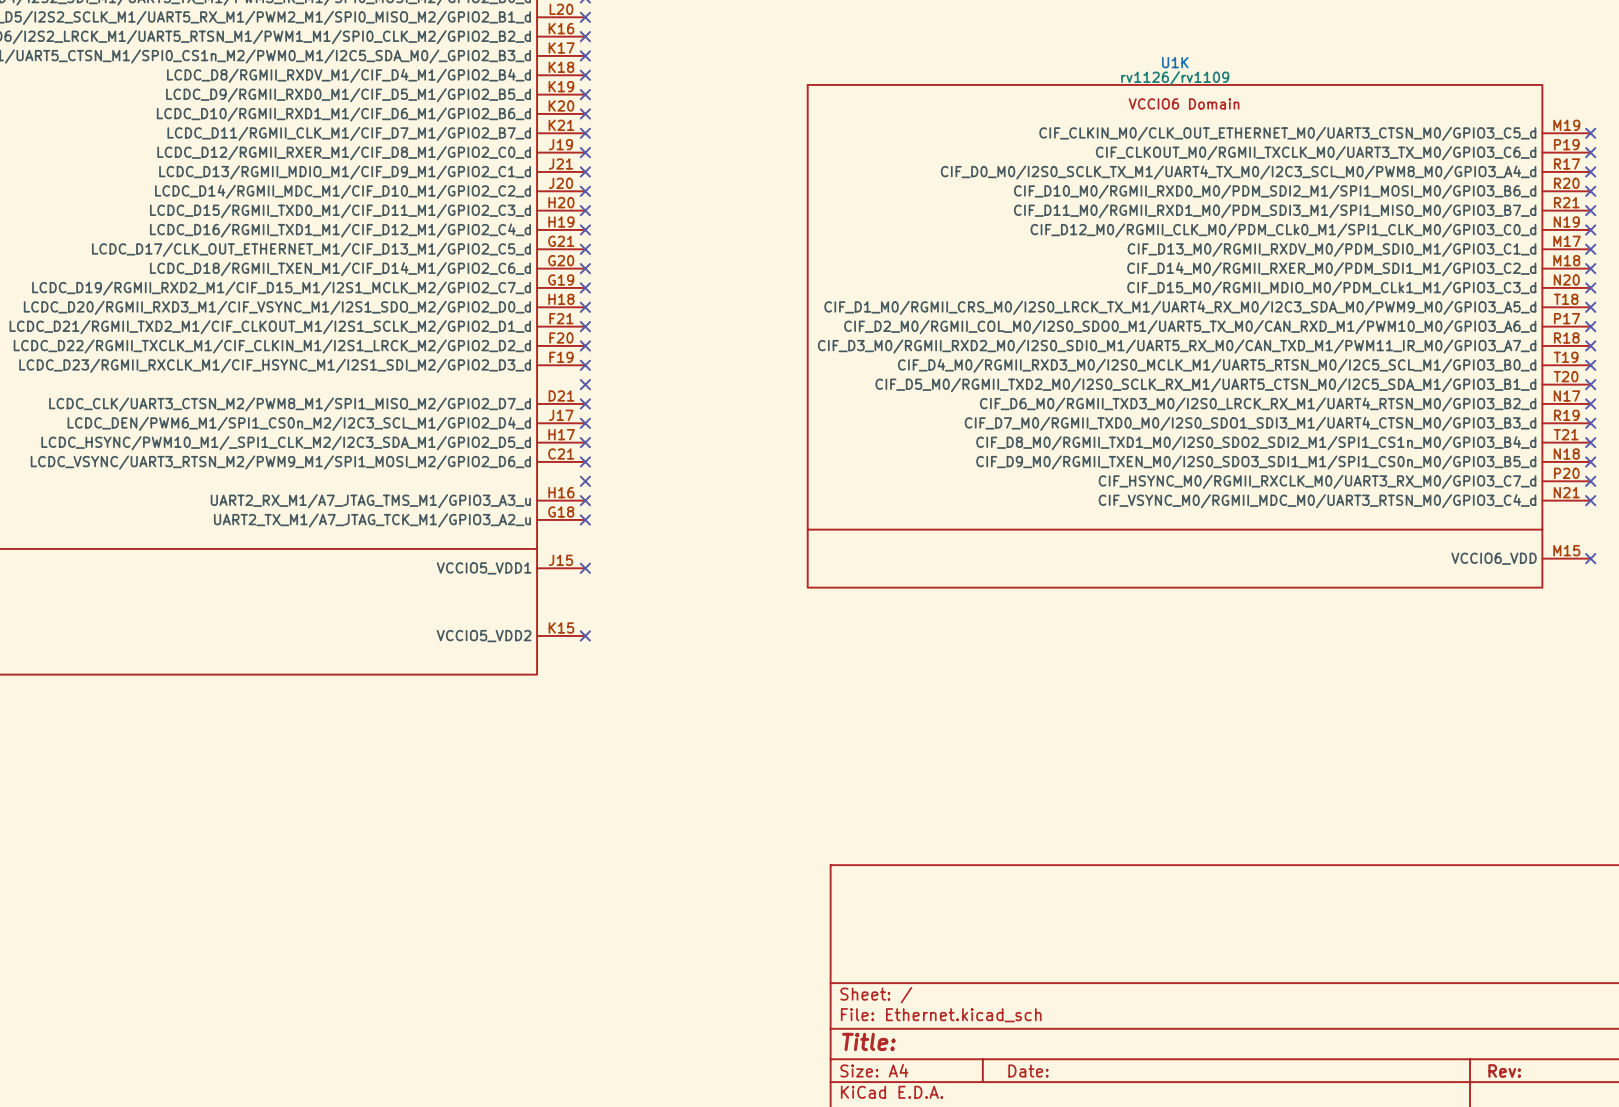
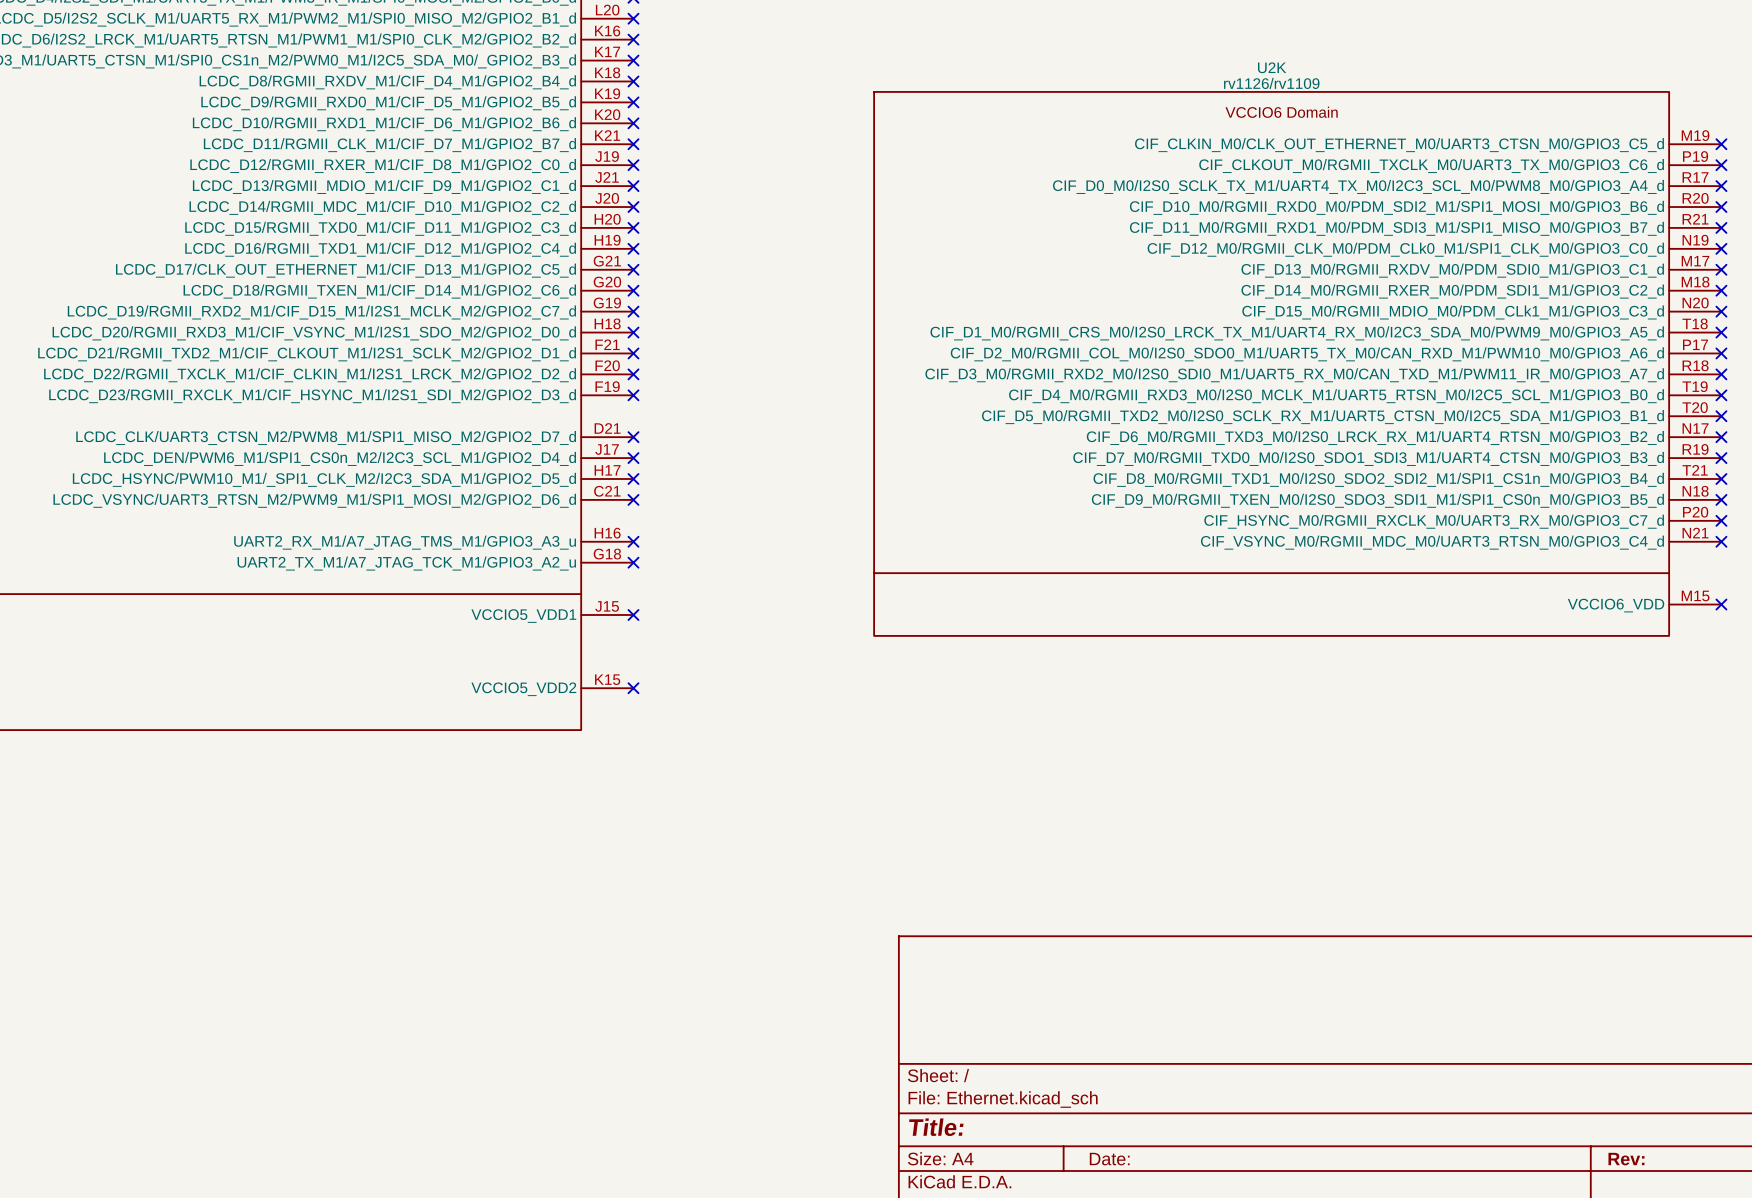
U1K name: U1K (1175, 62) -> U2K (1272, 67)
no-connect mark: (585, 384) -> none
no-connect mark: (585, 481) -> none

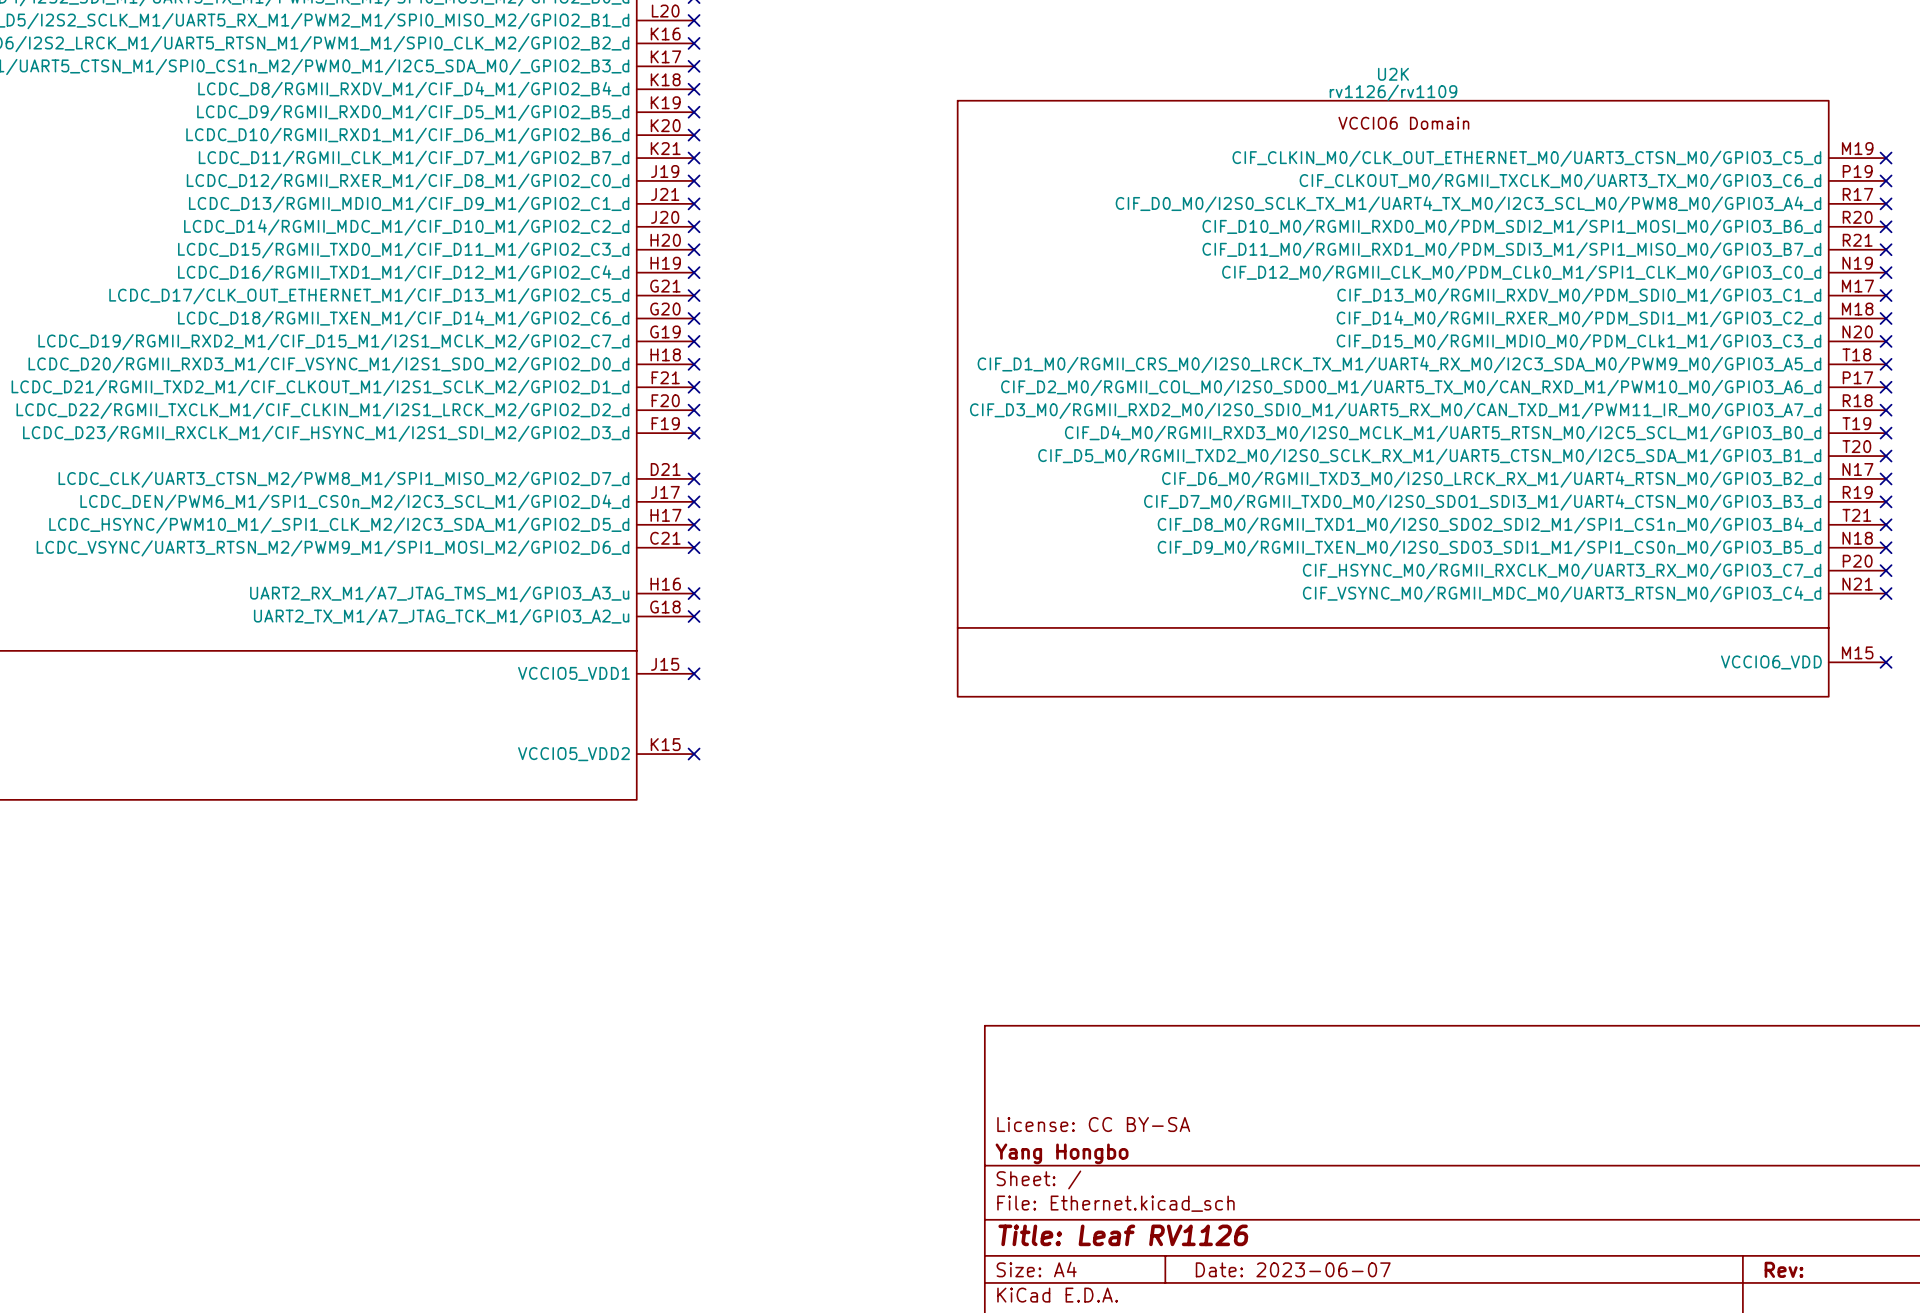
title block: none -> License: CC BY-SA (1093, 1124)
title block: none -> Yang Hongbo (1062, 1153)
title block: Title: (936, 1127) -> Title: Leaf RV1126 (1123, 1235)
title block: Date: (1109, 1159) -> Date: 2023-06-07 (1293, 1269)

